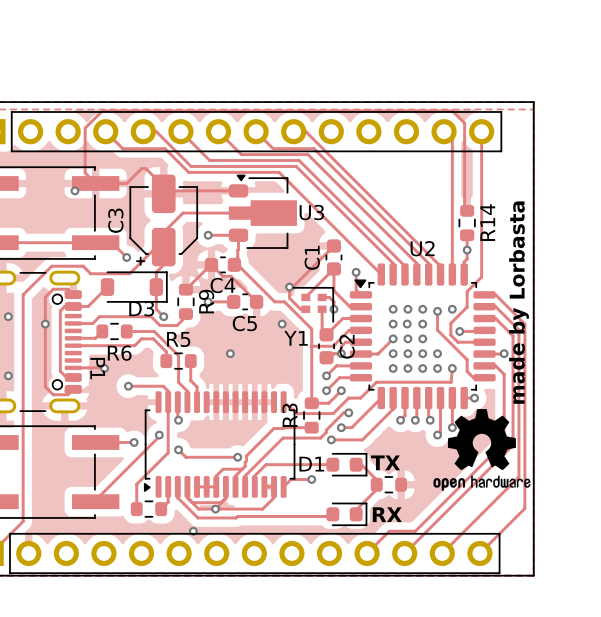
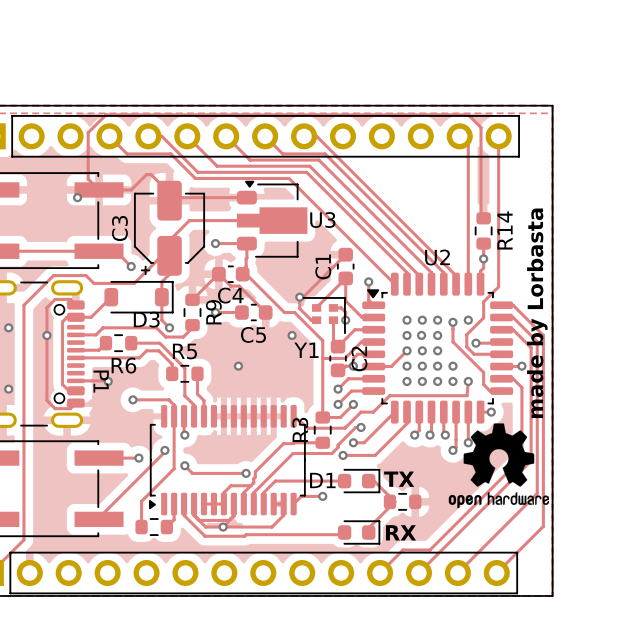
via: (193, 531) -> none

